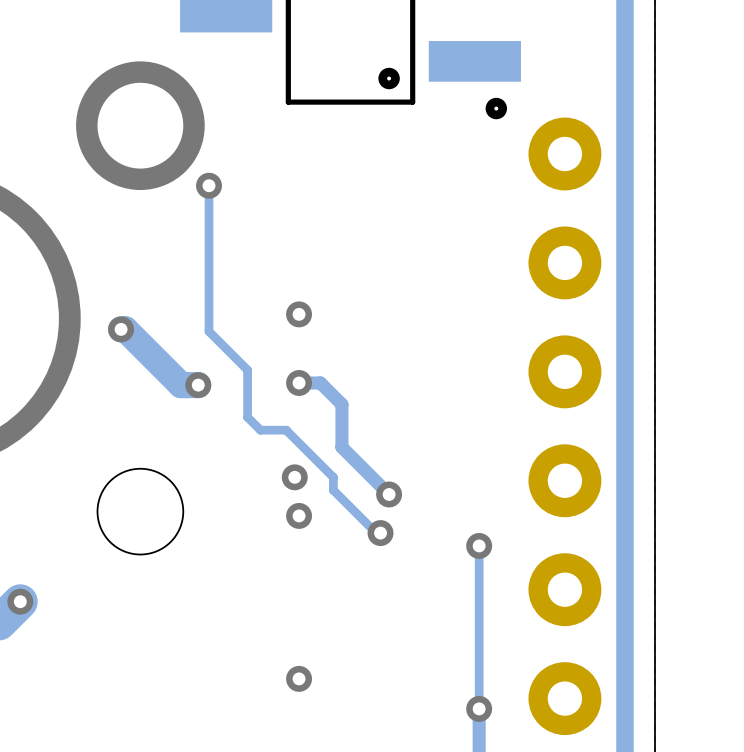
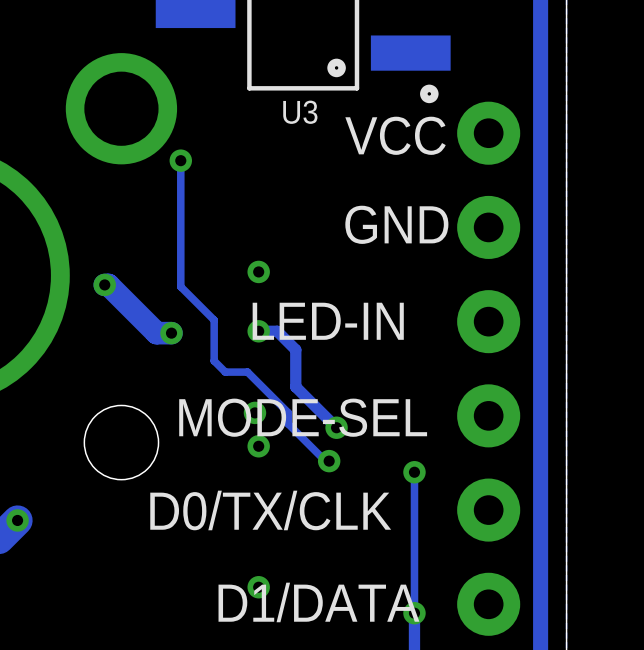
text: none -> U3 (300, 112)
VCC name: none -> VCC (395, 135)
GND name: none -> GND (396, 224)
LED-IN name: none -> LED-IN (328, 321)
MODE-SEL name: none -> MODE-SEL (303, 417)
D0/TX/CLK name: none -> D0/TX/CLK (270, 510)
D1/DATA name: none -> D1/DATA (318, 602)

